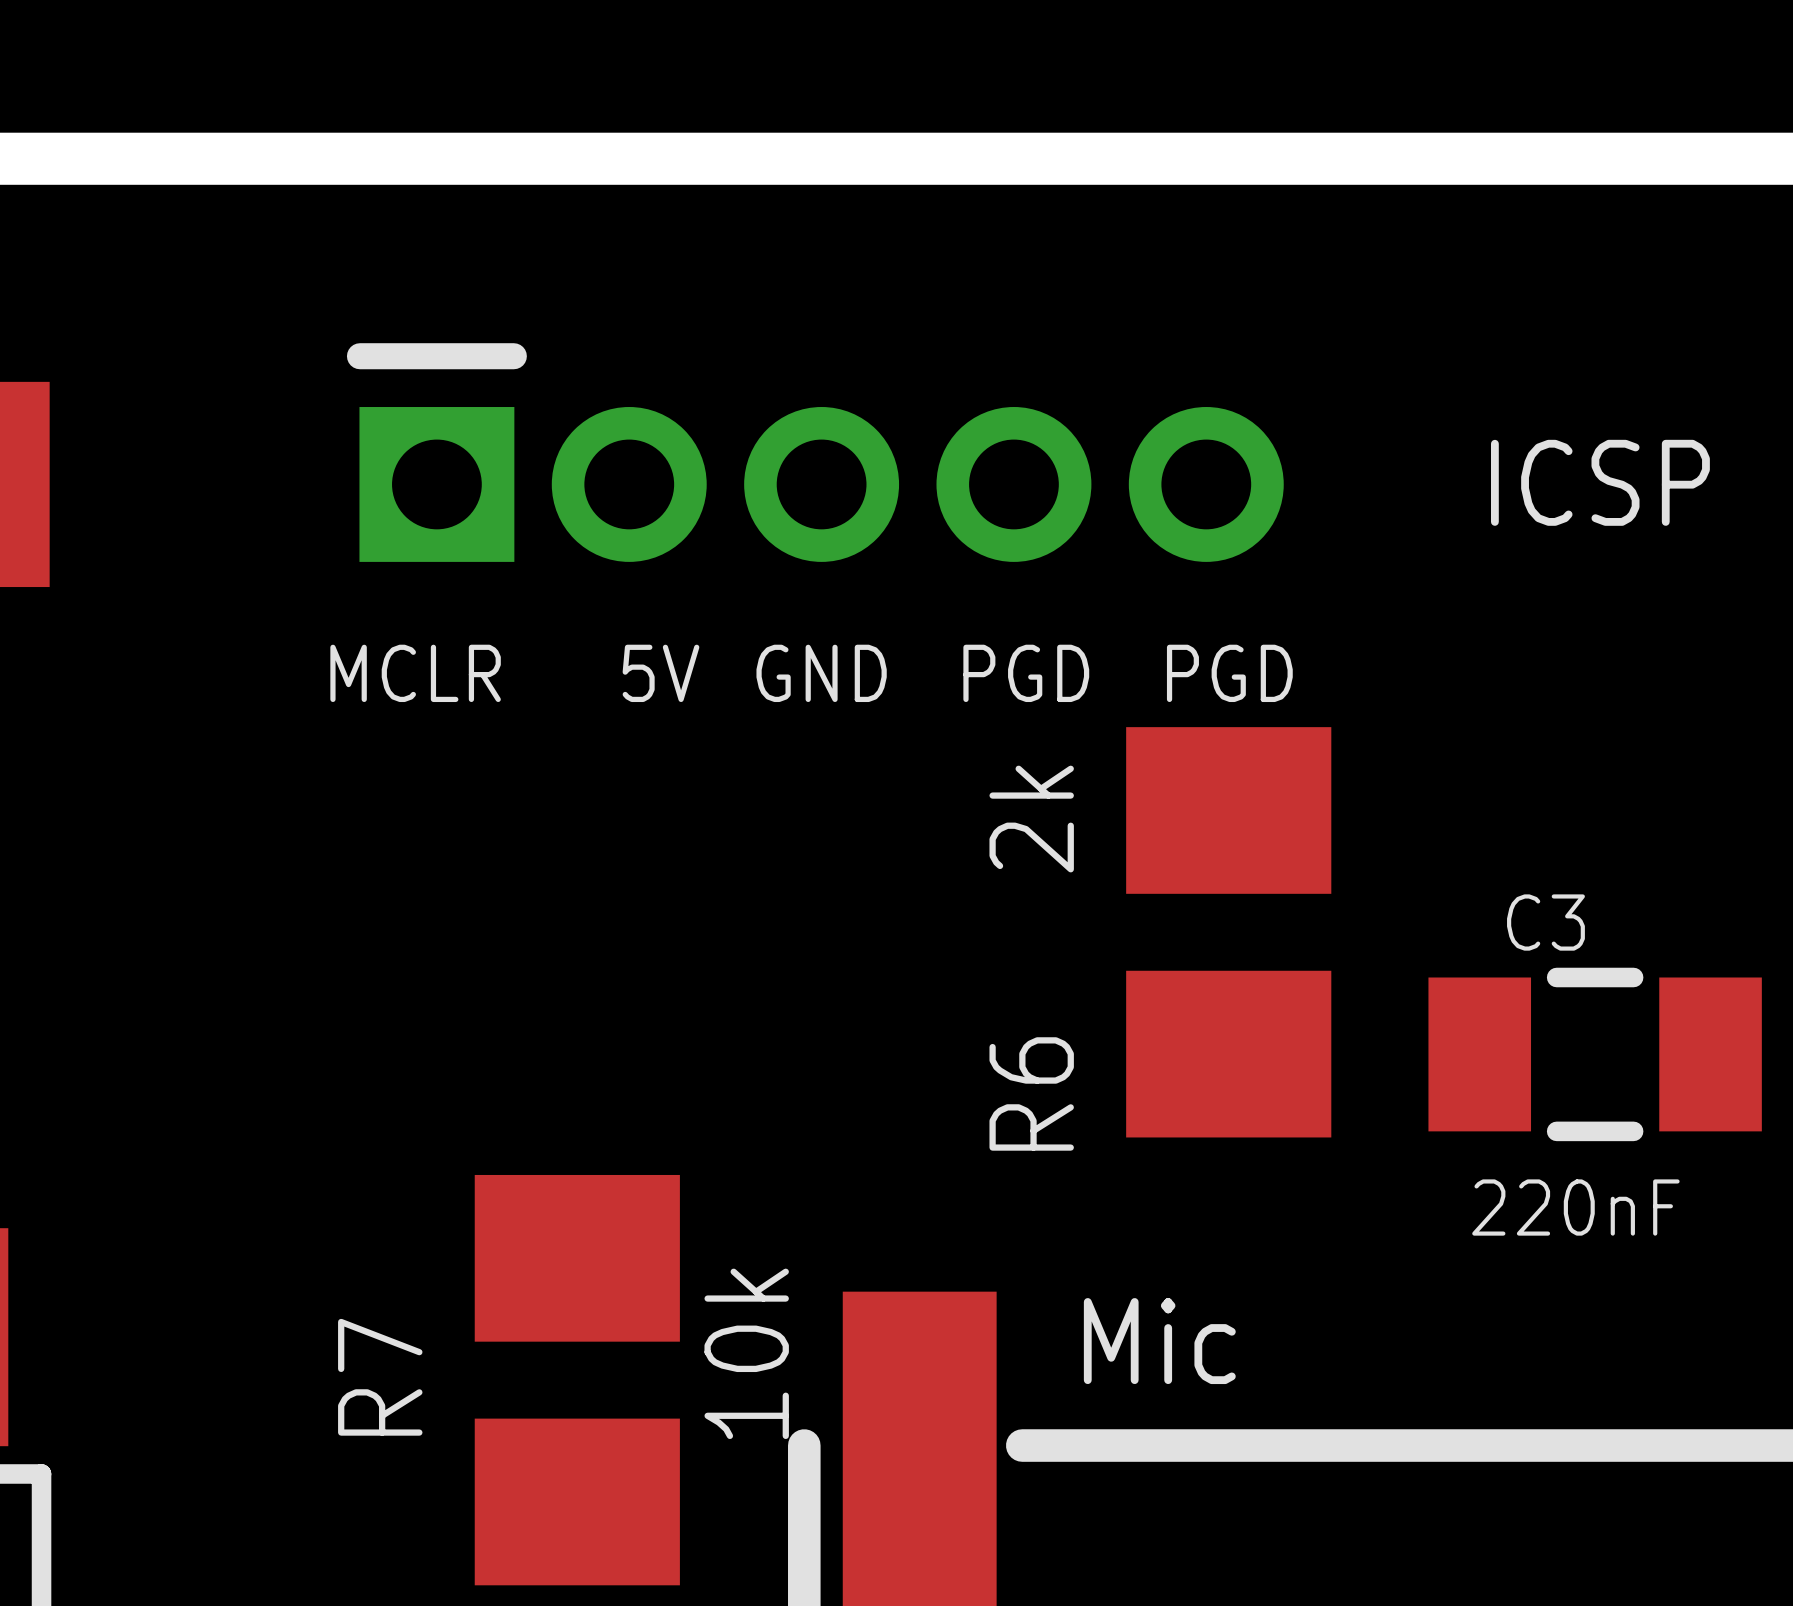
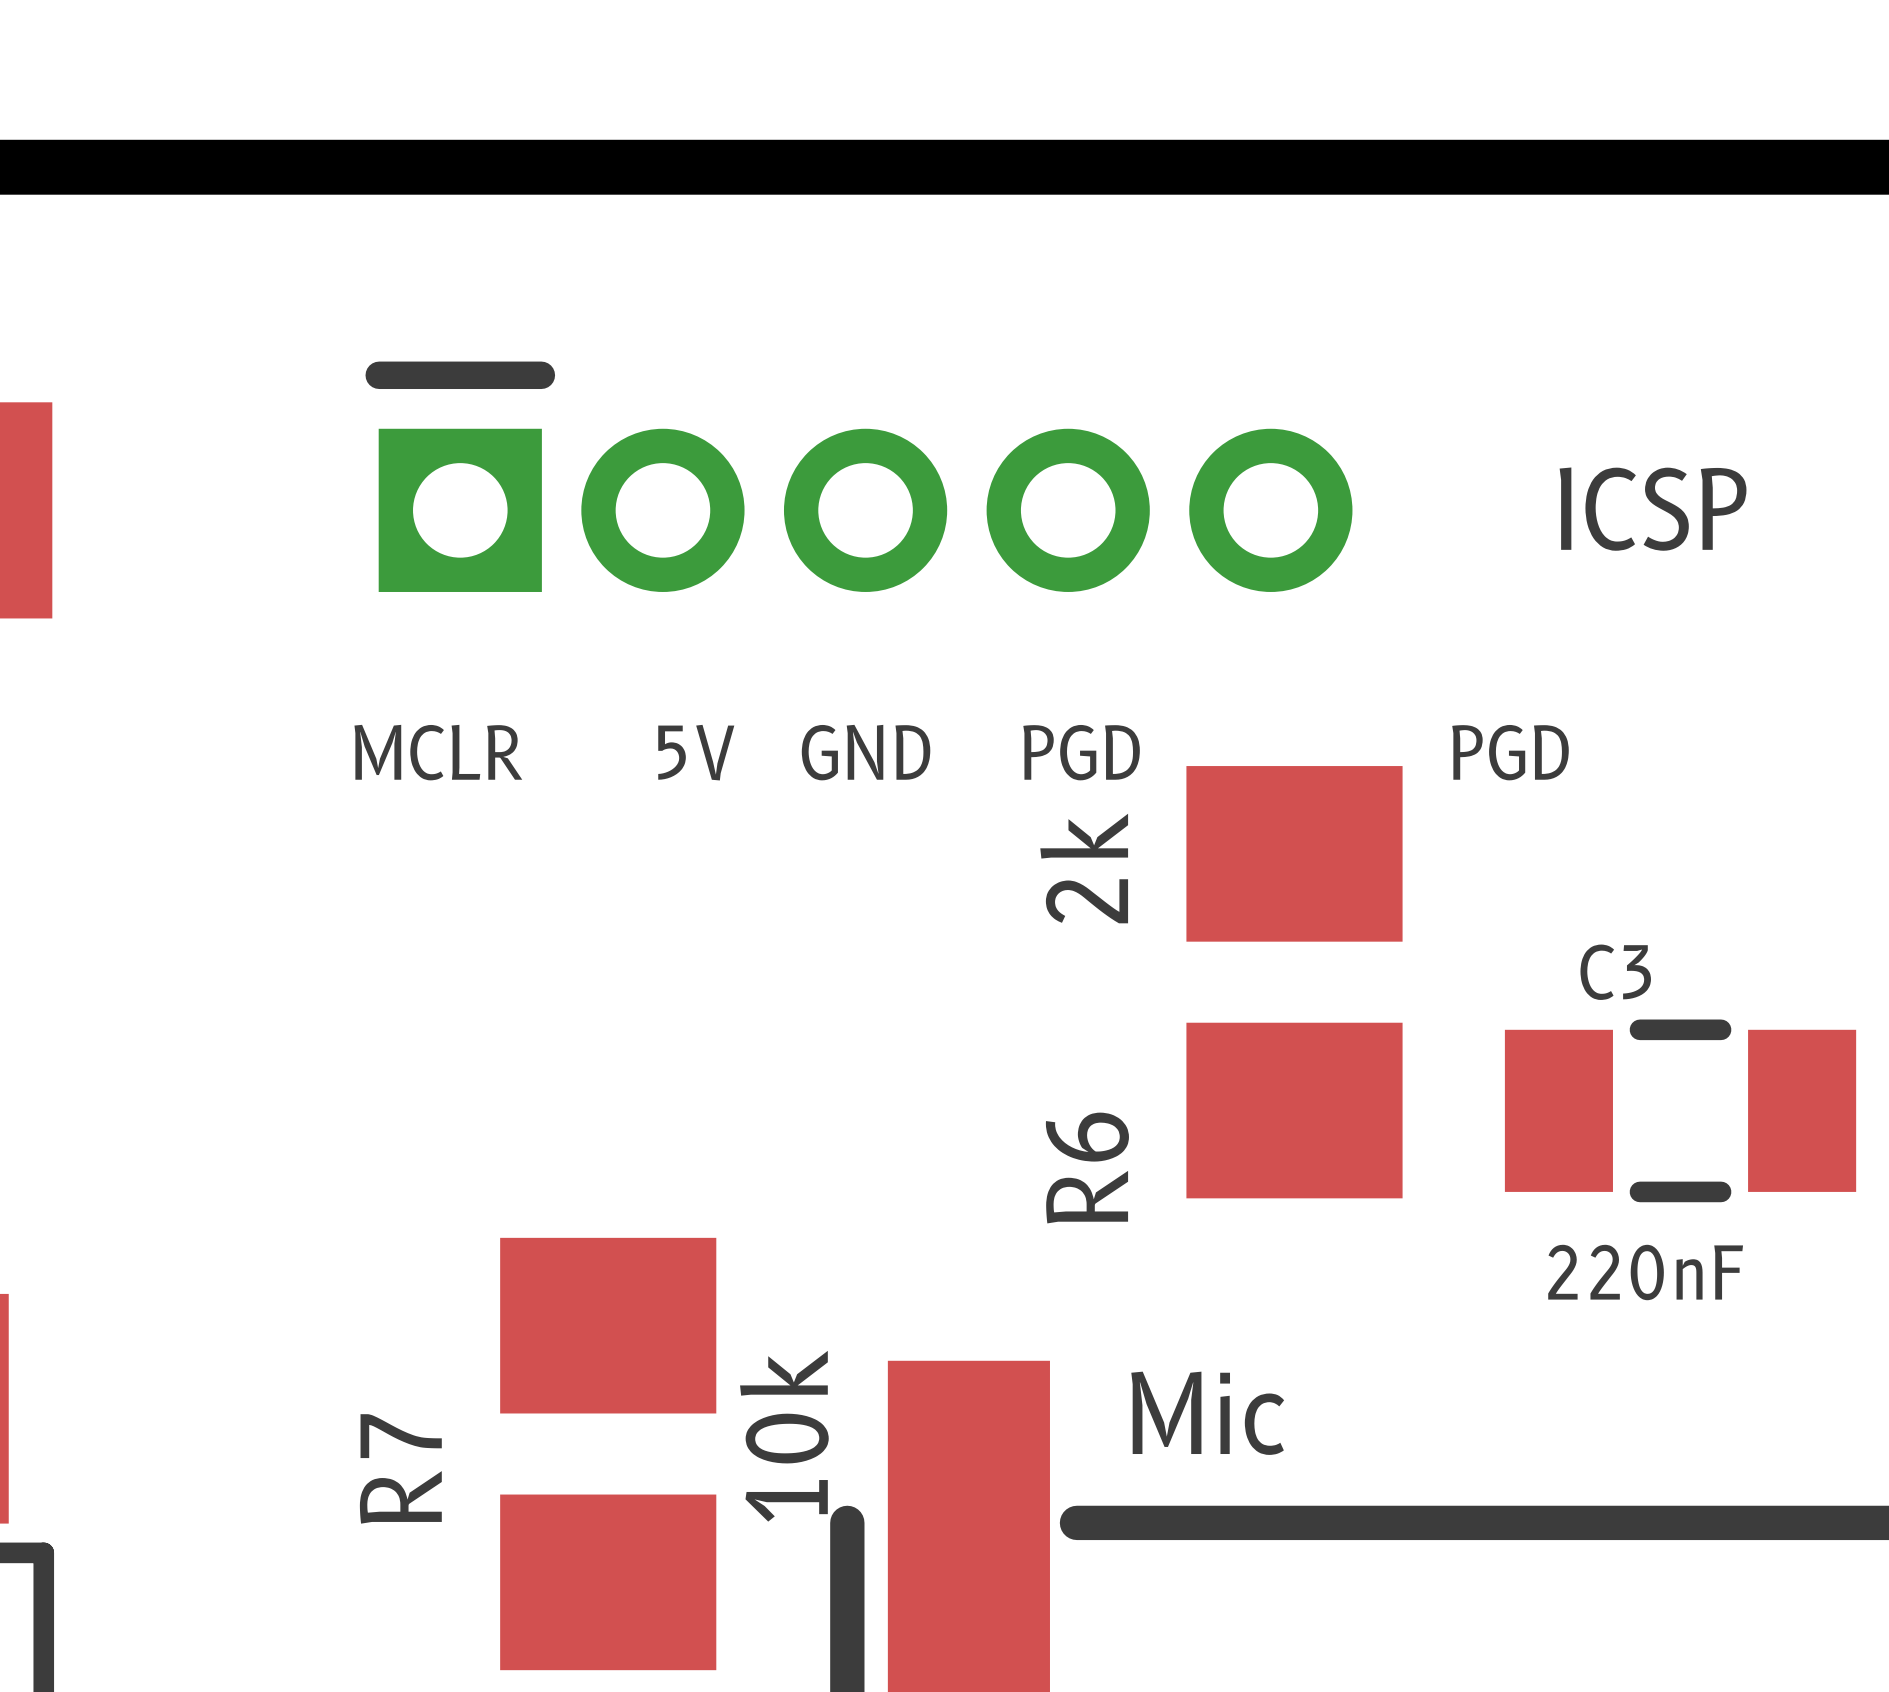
text position: MCLR (415, 673) -> MCLR (438, 752)
text position: 5V (660, 673) -> 5V (696, 752)
text position: GND (821, 673) -> GND (866, 752)
text position: PGD (1026, 673) -> PGD (1081, 752)
text position: PGD (1229, 673) -> PGD (1510, 752)

